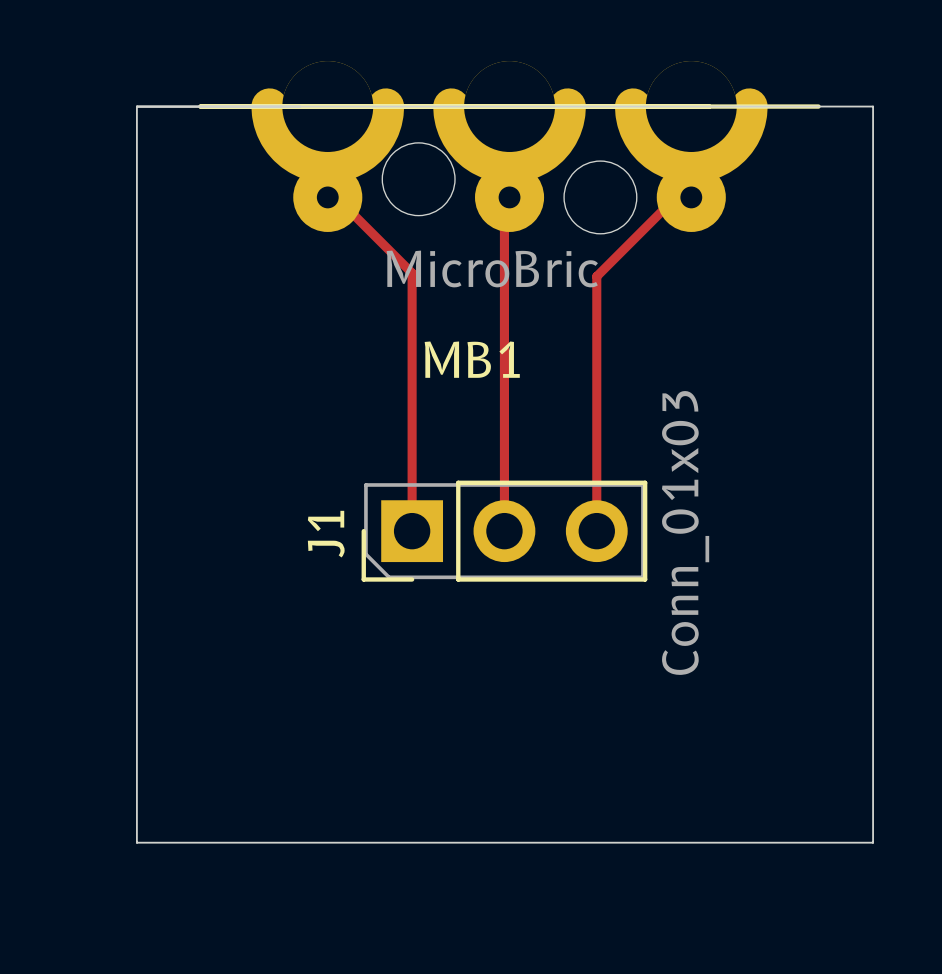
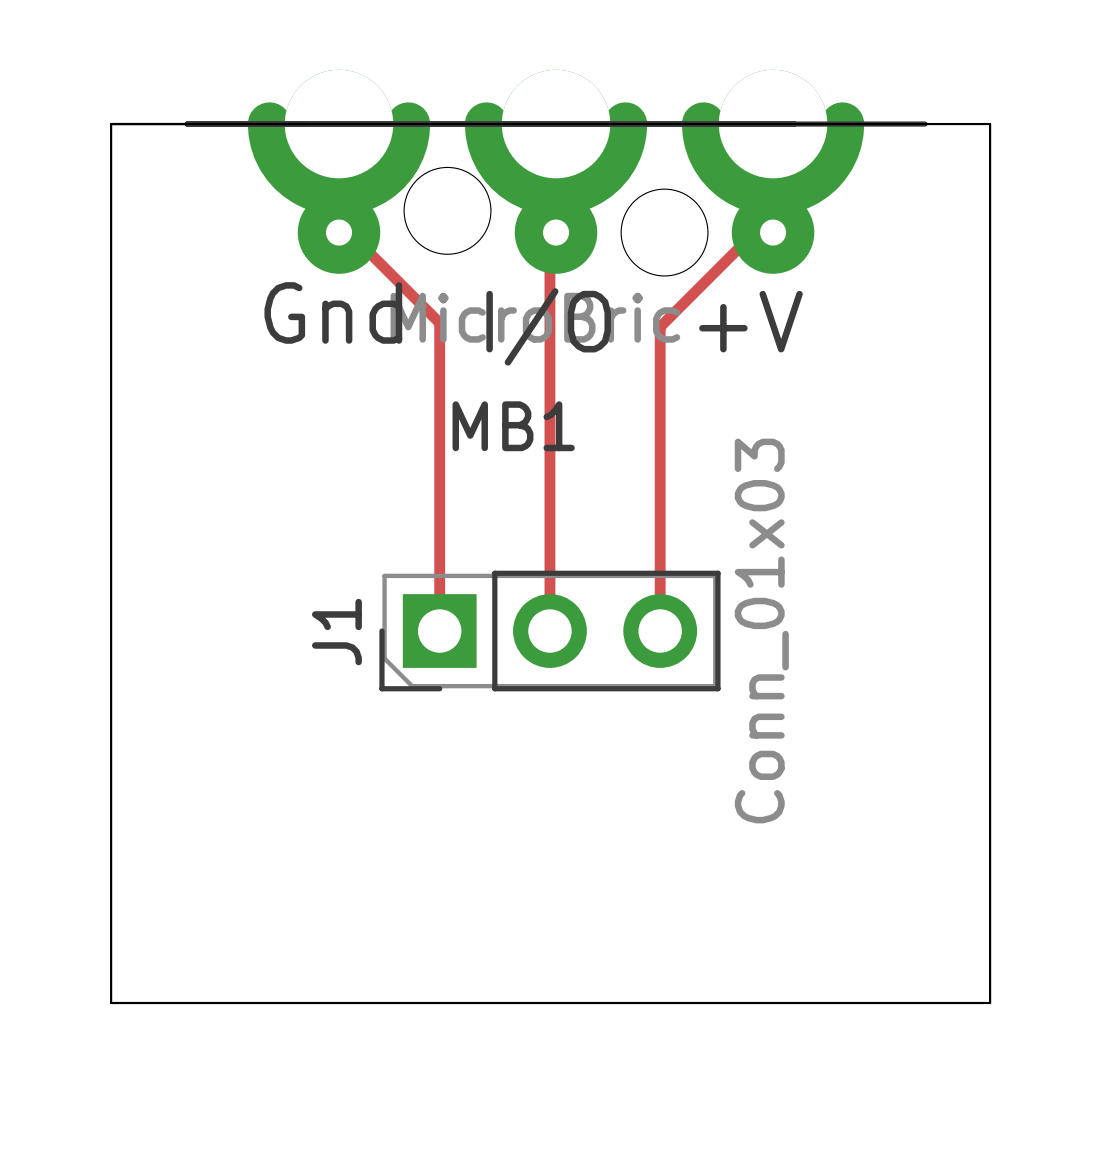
MB1 text: none -> Gnd (333, 312)
MB1 text: none -> I/O (548, 326)
MB1 text: none -> +V (750, 321)

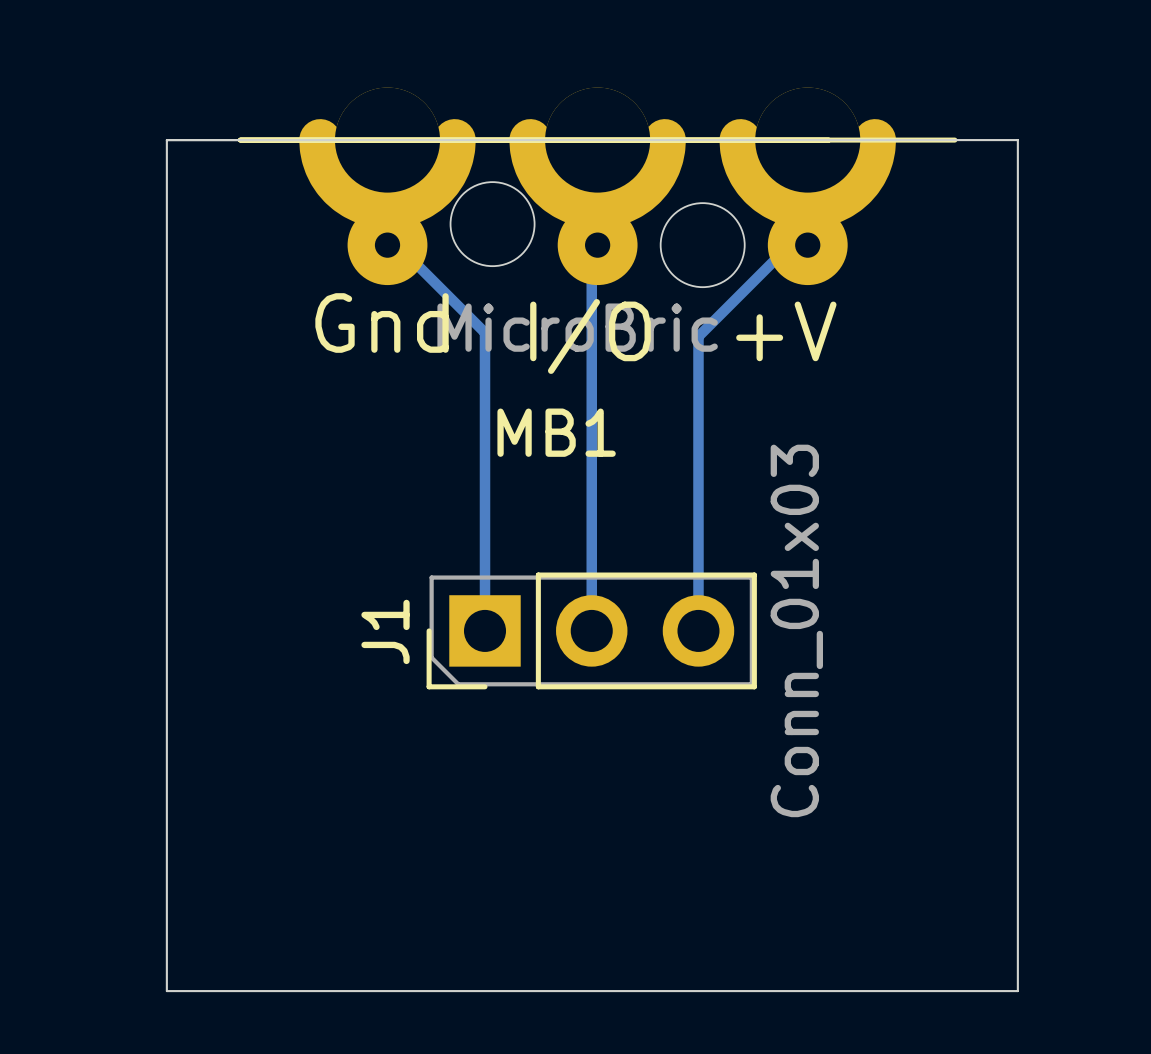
top track: (334, 109) (334, 218) (439, 323) (439, 631) -> none
bottom track: none -> (383, 126) (383, 231) (485, 332) (485, 630)
top track: (551, 109) (551, 218) (549, 220) (549, 631) -> none
bottom track: none -> (593, 126) (591, 630)
top track: (768, 109) (768, 218) (660, 326) (660, 631) -> none
bottom track: none -> (803, 126) (803, 231) (698, 336) (698, 630)

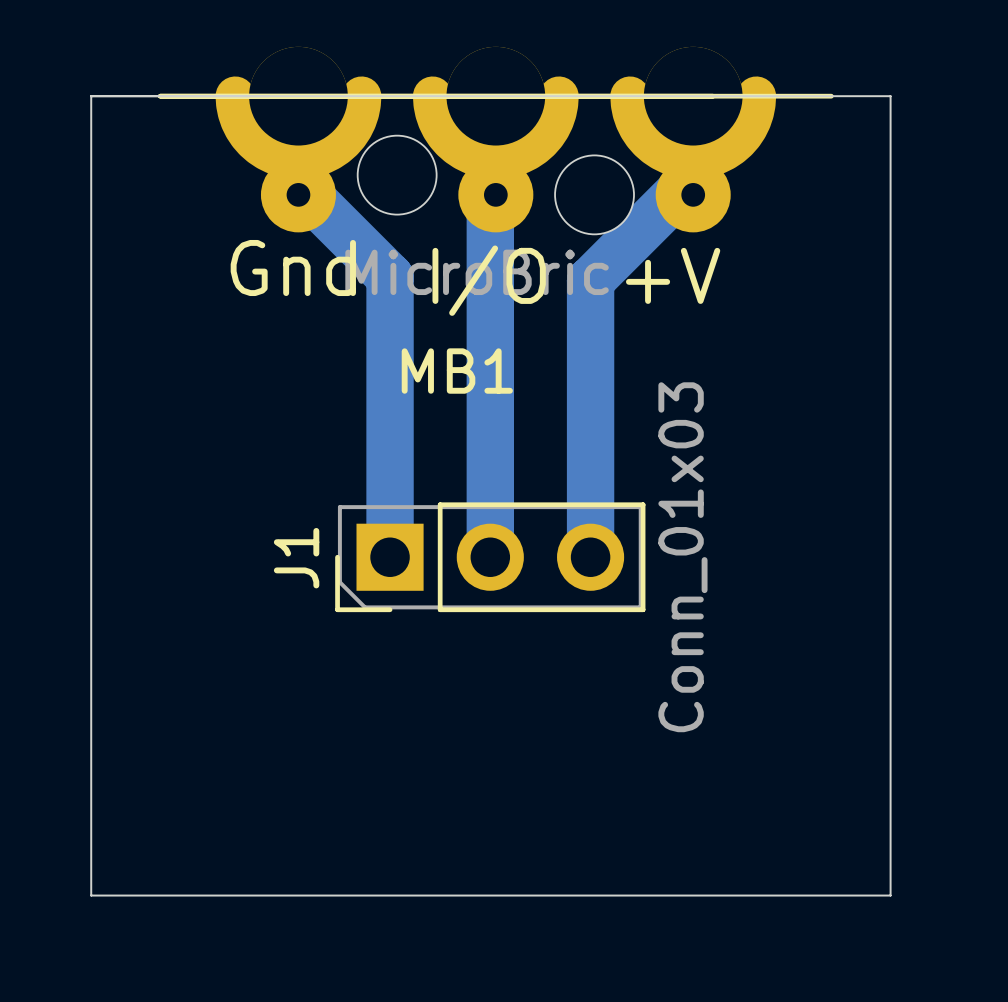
bottom track width: thin (383, 126) (383, 231) (485, 332) (485, 630) -> thick (294, 83) (294, 181) (390, 277) (390, 557)
bottom track width: thin (593, 126) (591, 630) -> thick (492, 83) (490, 557)
bottom track width: thin (803, 126) (803, 231) (698, 336) (698, 630) -> thick (689, 83) (689, 181) (590, 280) (590, 557)

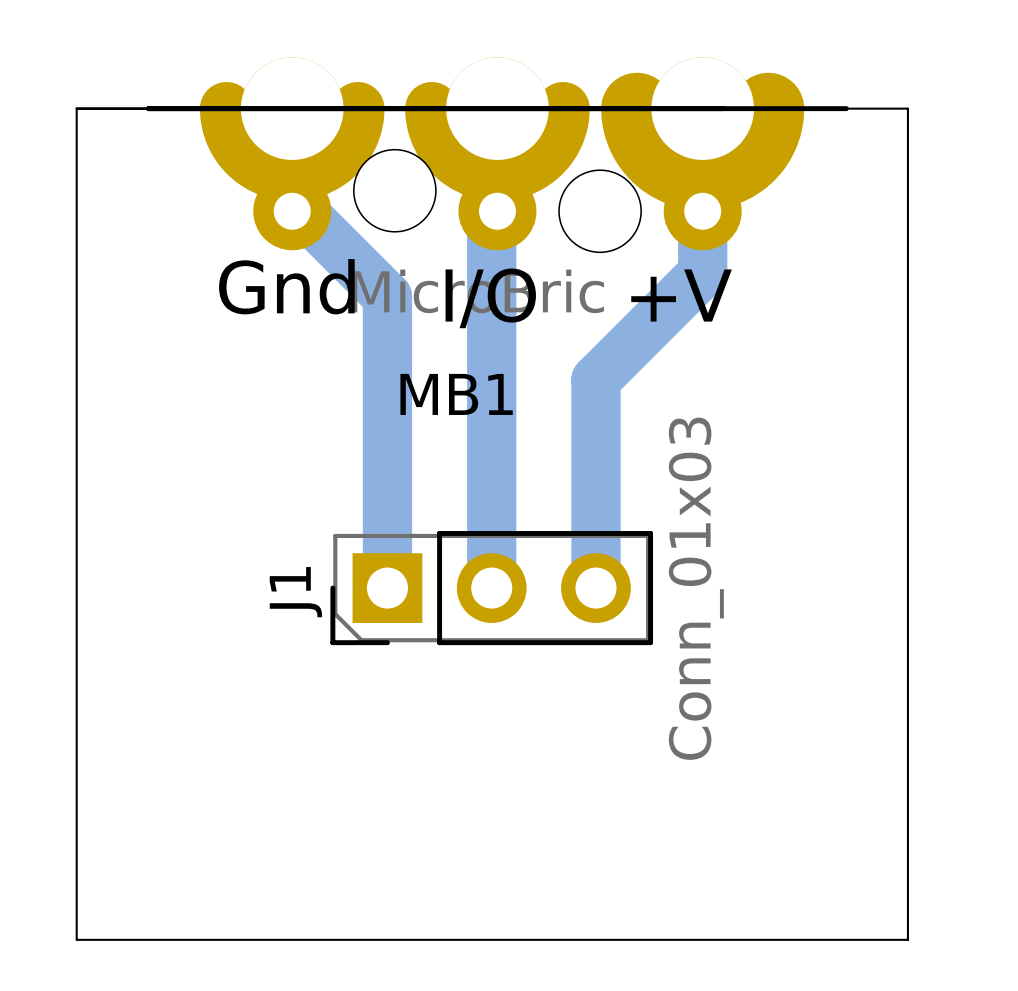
MB1 footprint: [157, 46, 834, 235] -> [146, 57, 849, 253]
bottom track: (689, 181) (590, 280) (590, 357) -> (702, 211) (702, 273) (595, 379)

